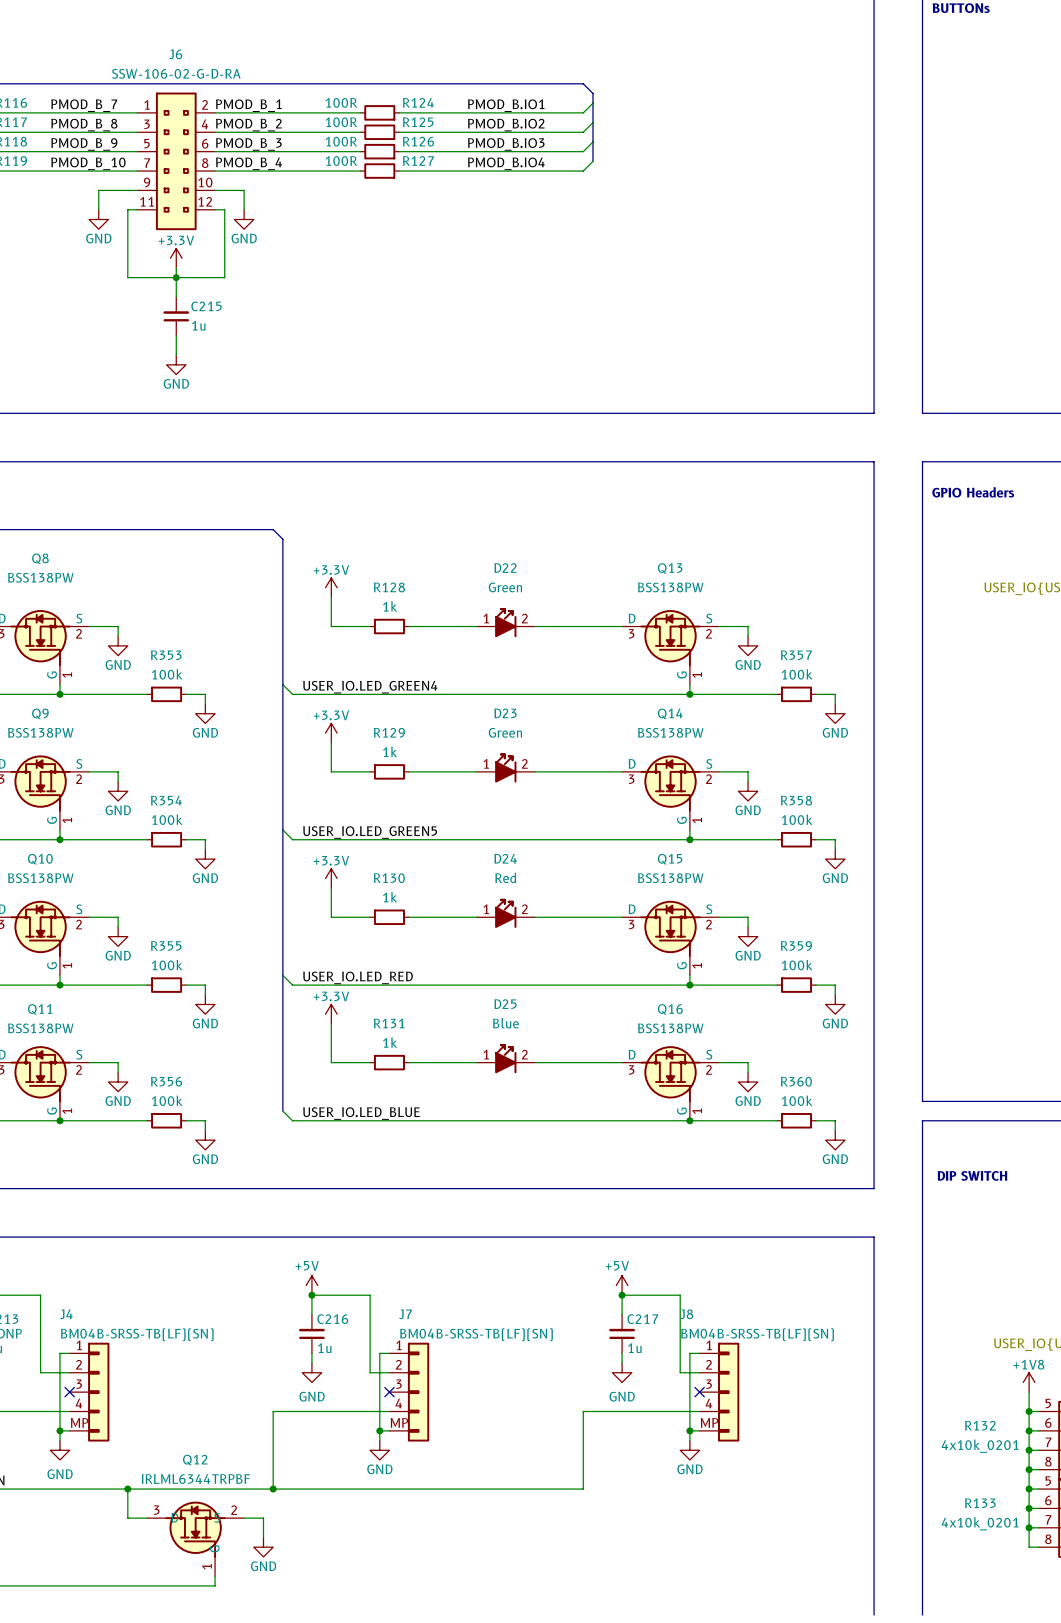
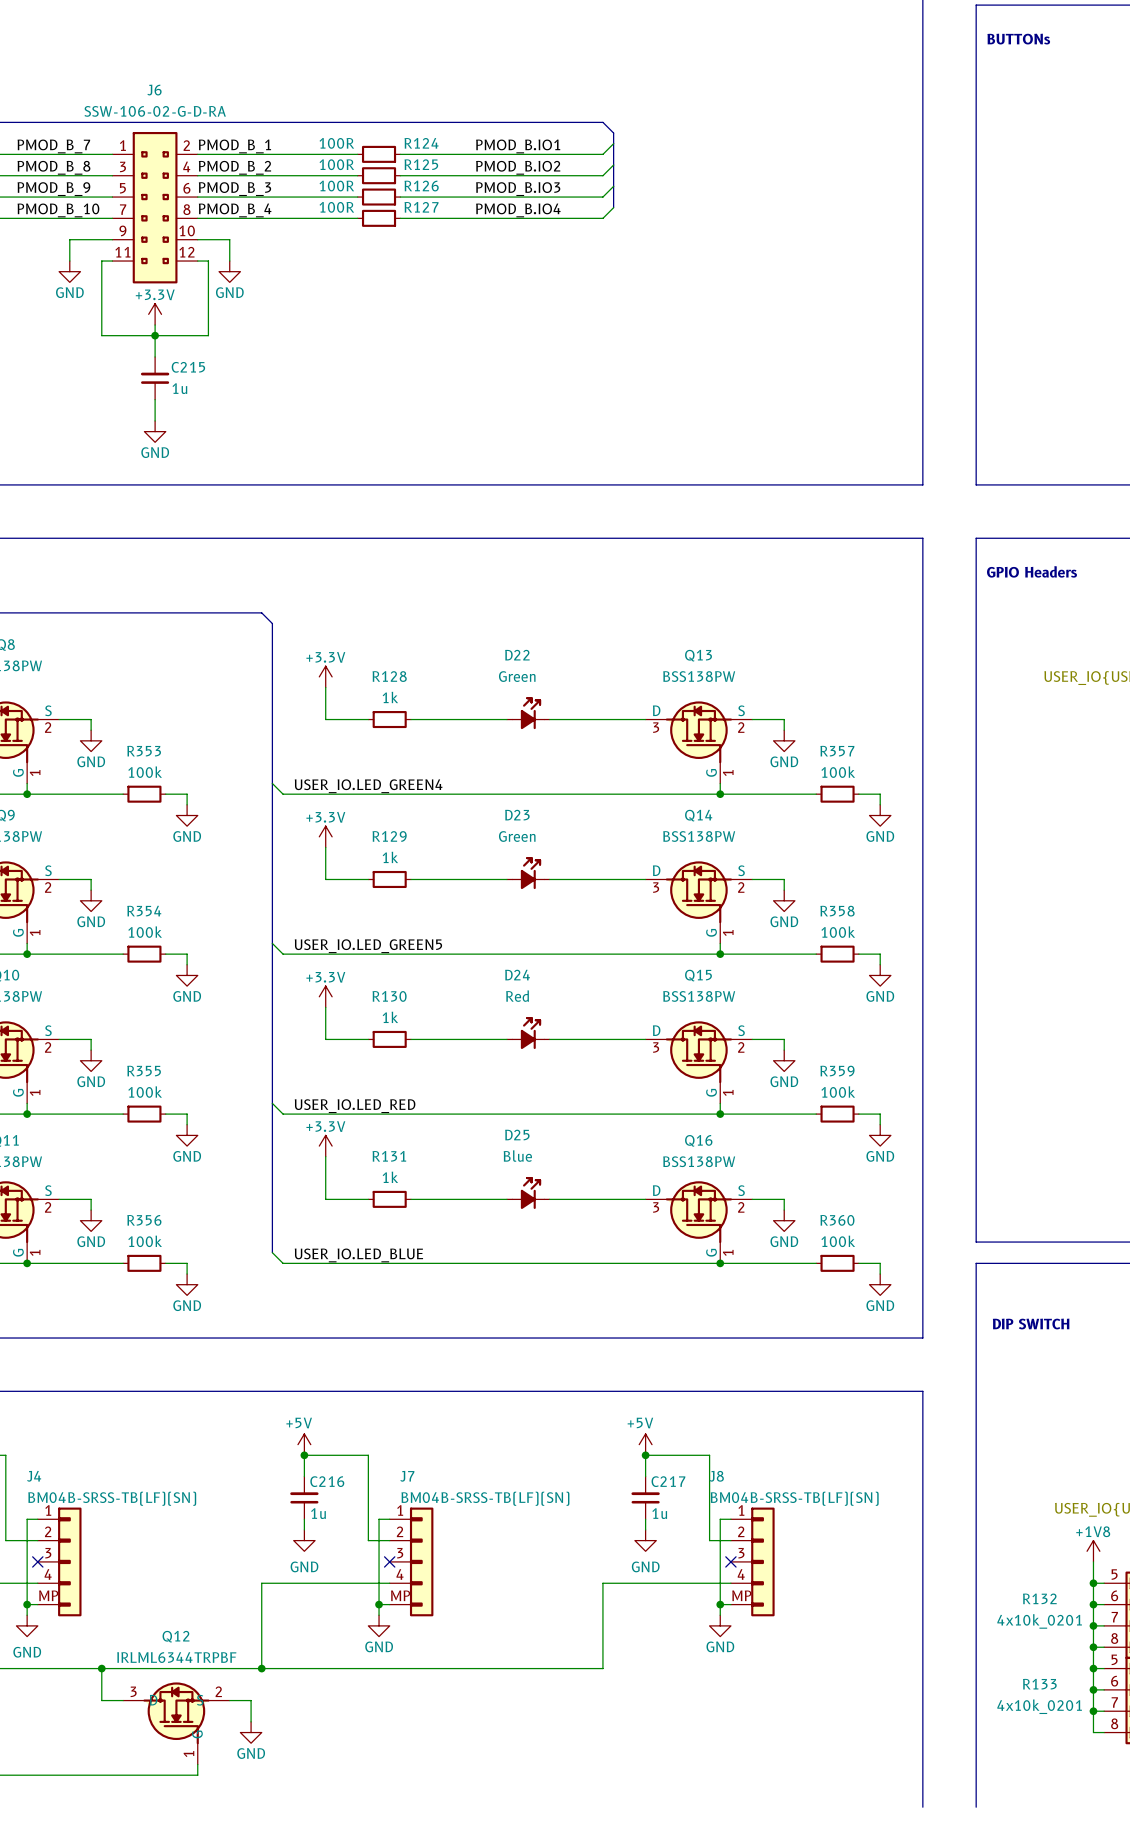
D22 symbol: [476, 608, 535, 638] -> [506, 697, 550, 730]
D23 symbol: [476, 753, 535, 783] -> [506, 857, 550, 890]
D24 symbol: [476, 898, 535, 928] -> [506, 1017, 550, 1050]
D25 symbol: [476, 1044, 535, 1074] -> [506, 1176, 550, 1209]

